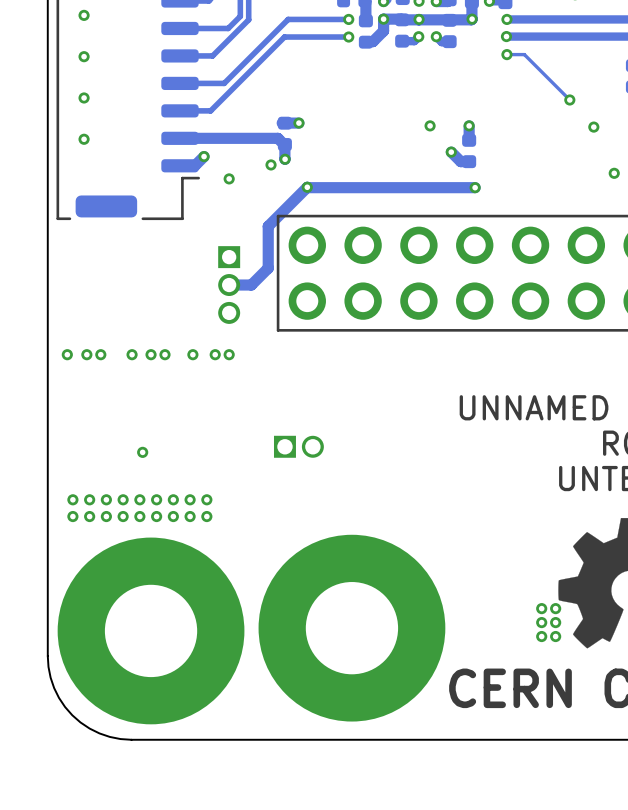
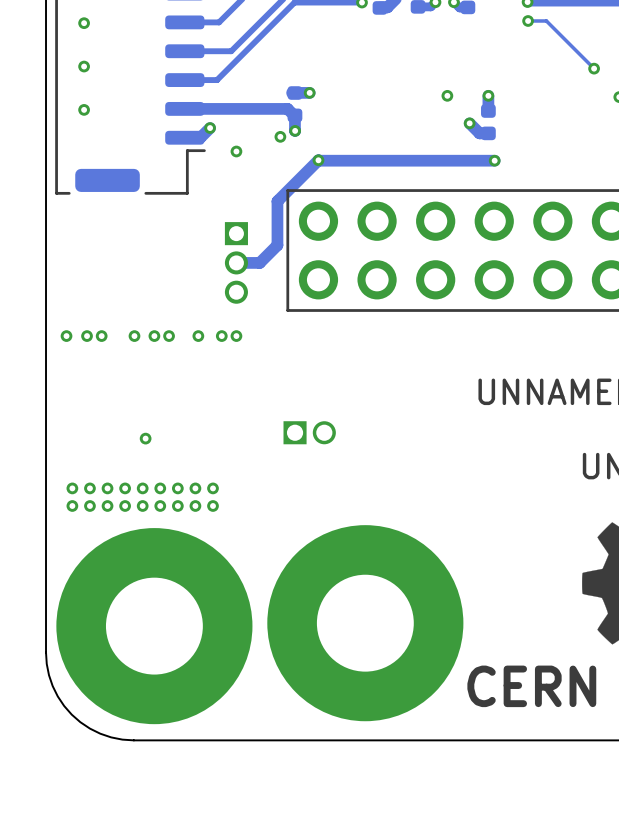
via: (541, 608) -> none
via: (555, 608) -> none
via: (541, 622) -> none
via: (555, 622) -> none
via: (541, 636) -> none
via: (555, 636) -> none

